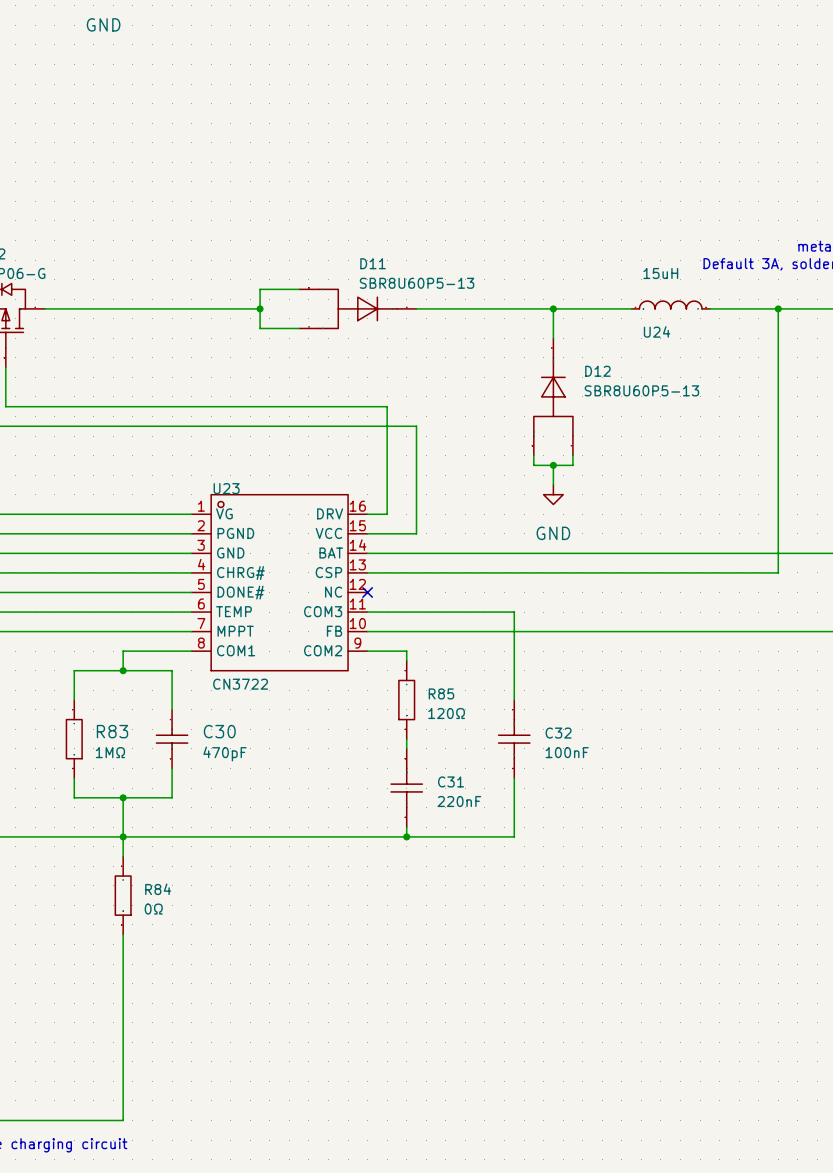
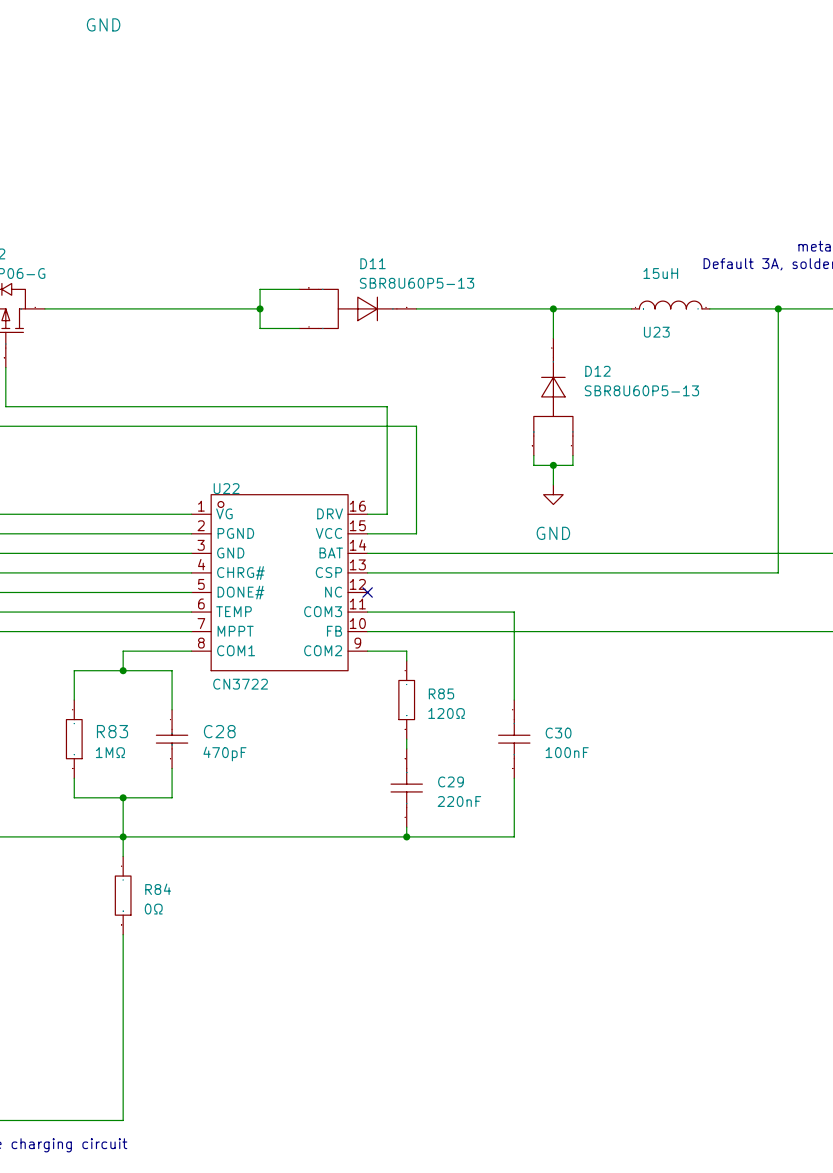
U24 name: U24 (657, 331) -> U23 (656, 332)
U23 name: U23 (226, 488) -> U22 (226, 488)
C30 name: C30 (219, 731) -> C28 (219, 731)
C32 name: C32 (558, 733) -> C30 (558, 733)
C31 name: C31 (451, 781) -> C29 (451, 781)

